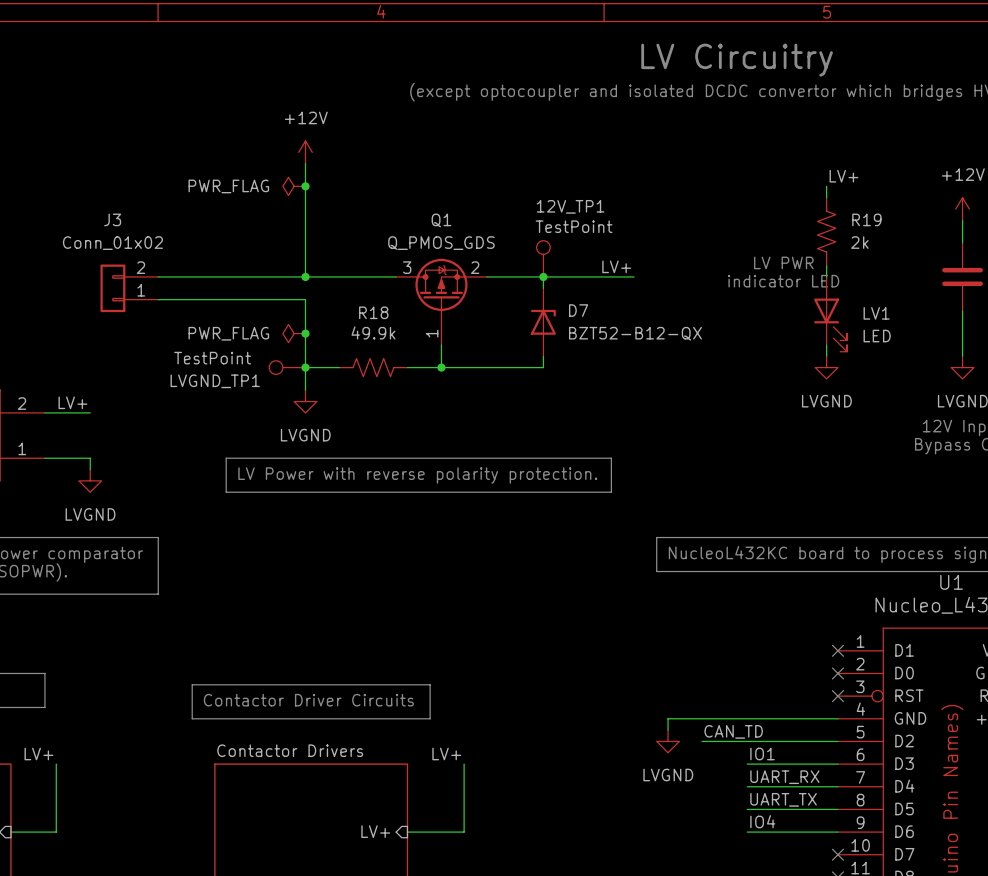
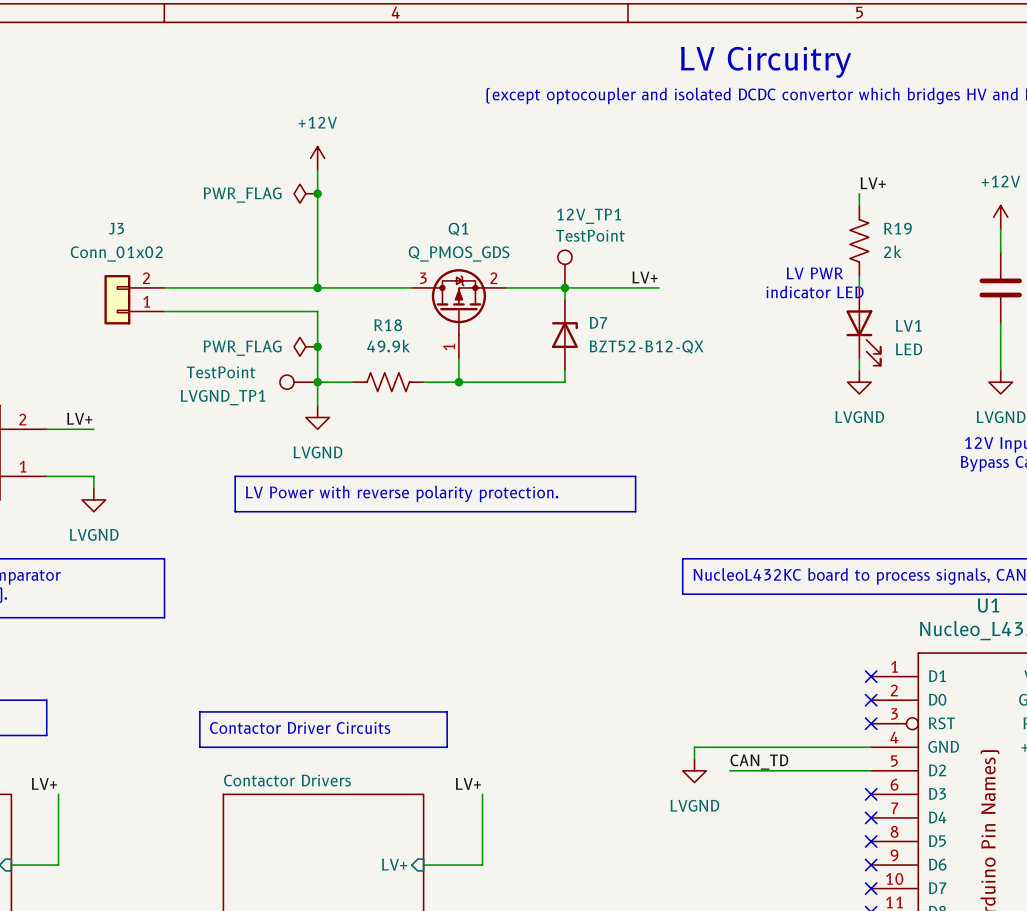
label: IO1 (762, 754) -> none
wire: (747, 764) (837, 764) -> none
no-connect mark: none -> (871, 794)
label: UART_RX (784, 777) -> none
wire: (747, 786) (837, 786) -> none
no-connect mark: none -> (871, 817)
label: UART_TX (783, 799) -> none
wire: (747, 809) (837, 809) -> none
no-connect mark: none -> (871, 841)
label: IO4 (762, 821) -> none
wire: (747, 832) (837, 832) -> none
no-connect mark: none -> (871, 865)

